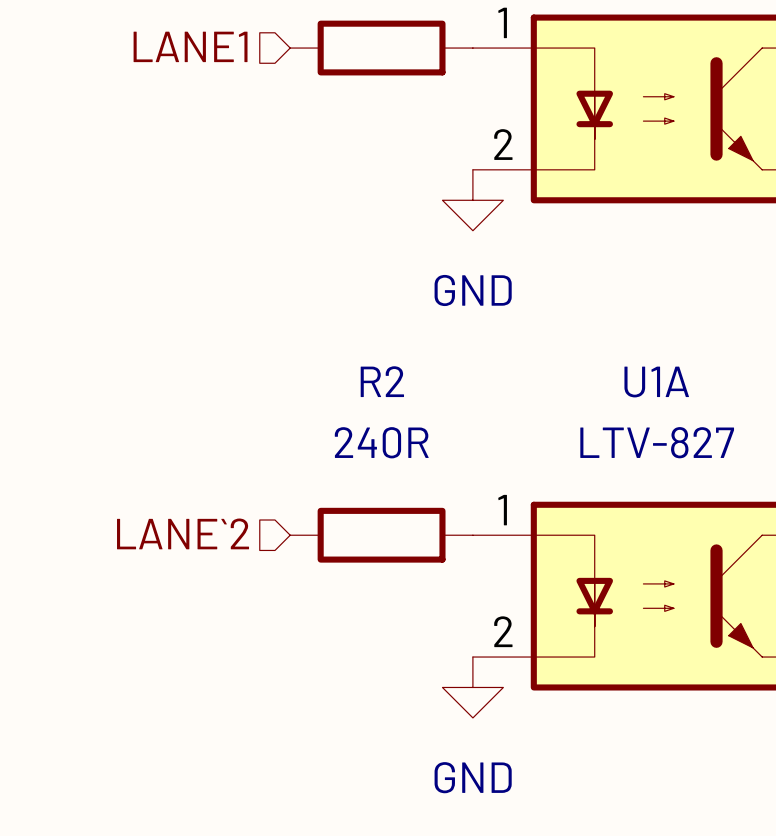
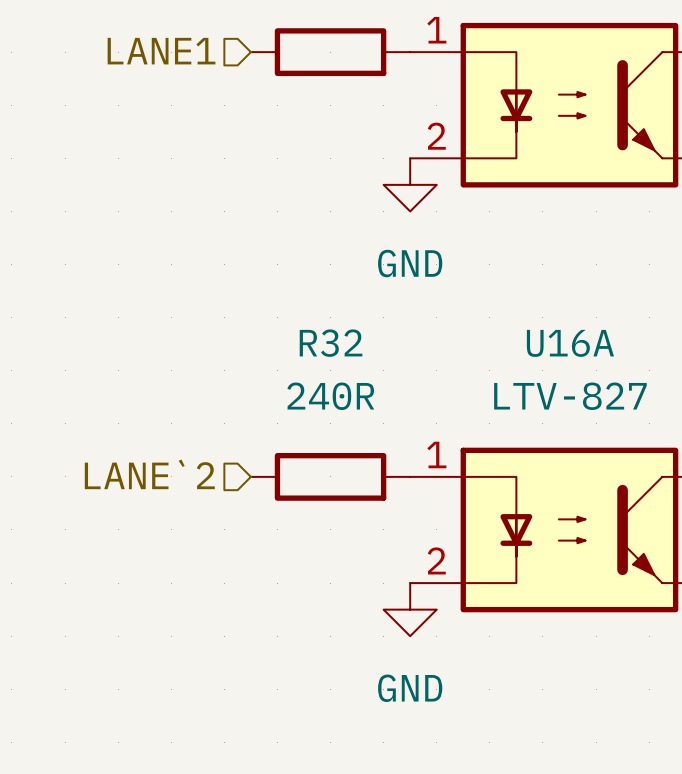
R2 name: R2 (382, 381) -> R32 (331, 343)
U1A name: U1A (656, 382) -> U16A (570, 343)

